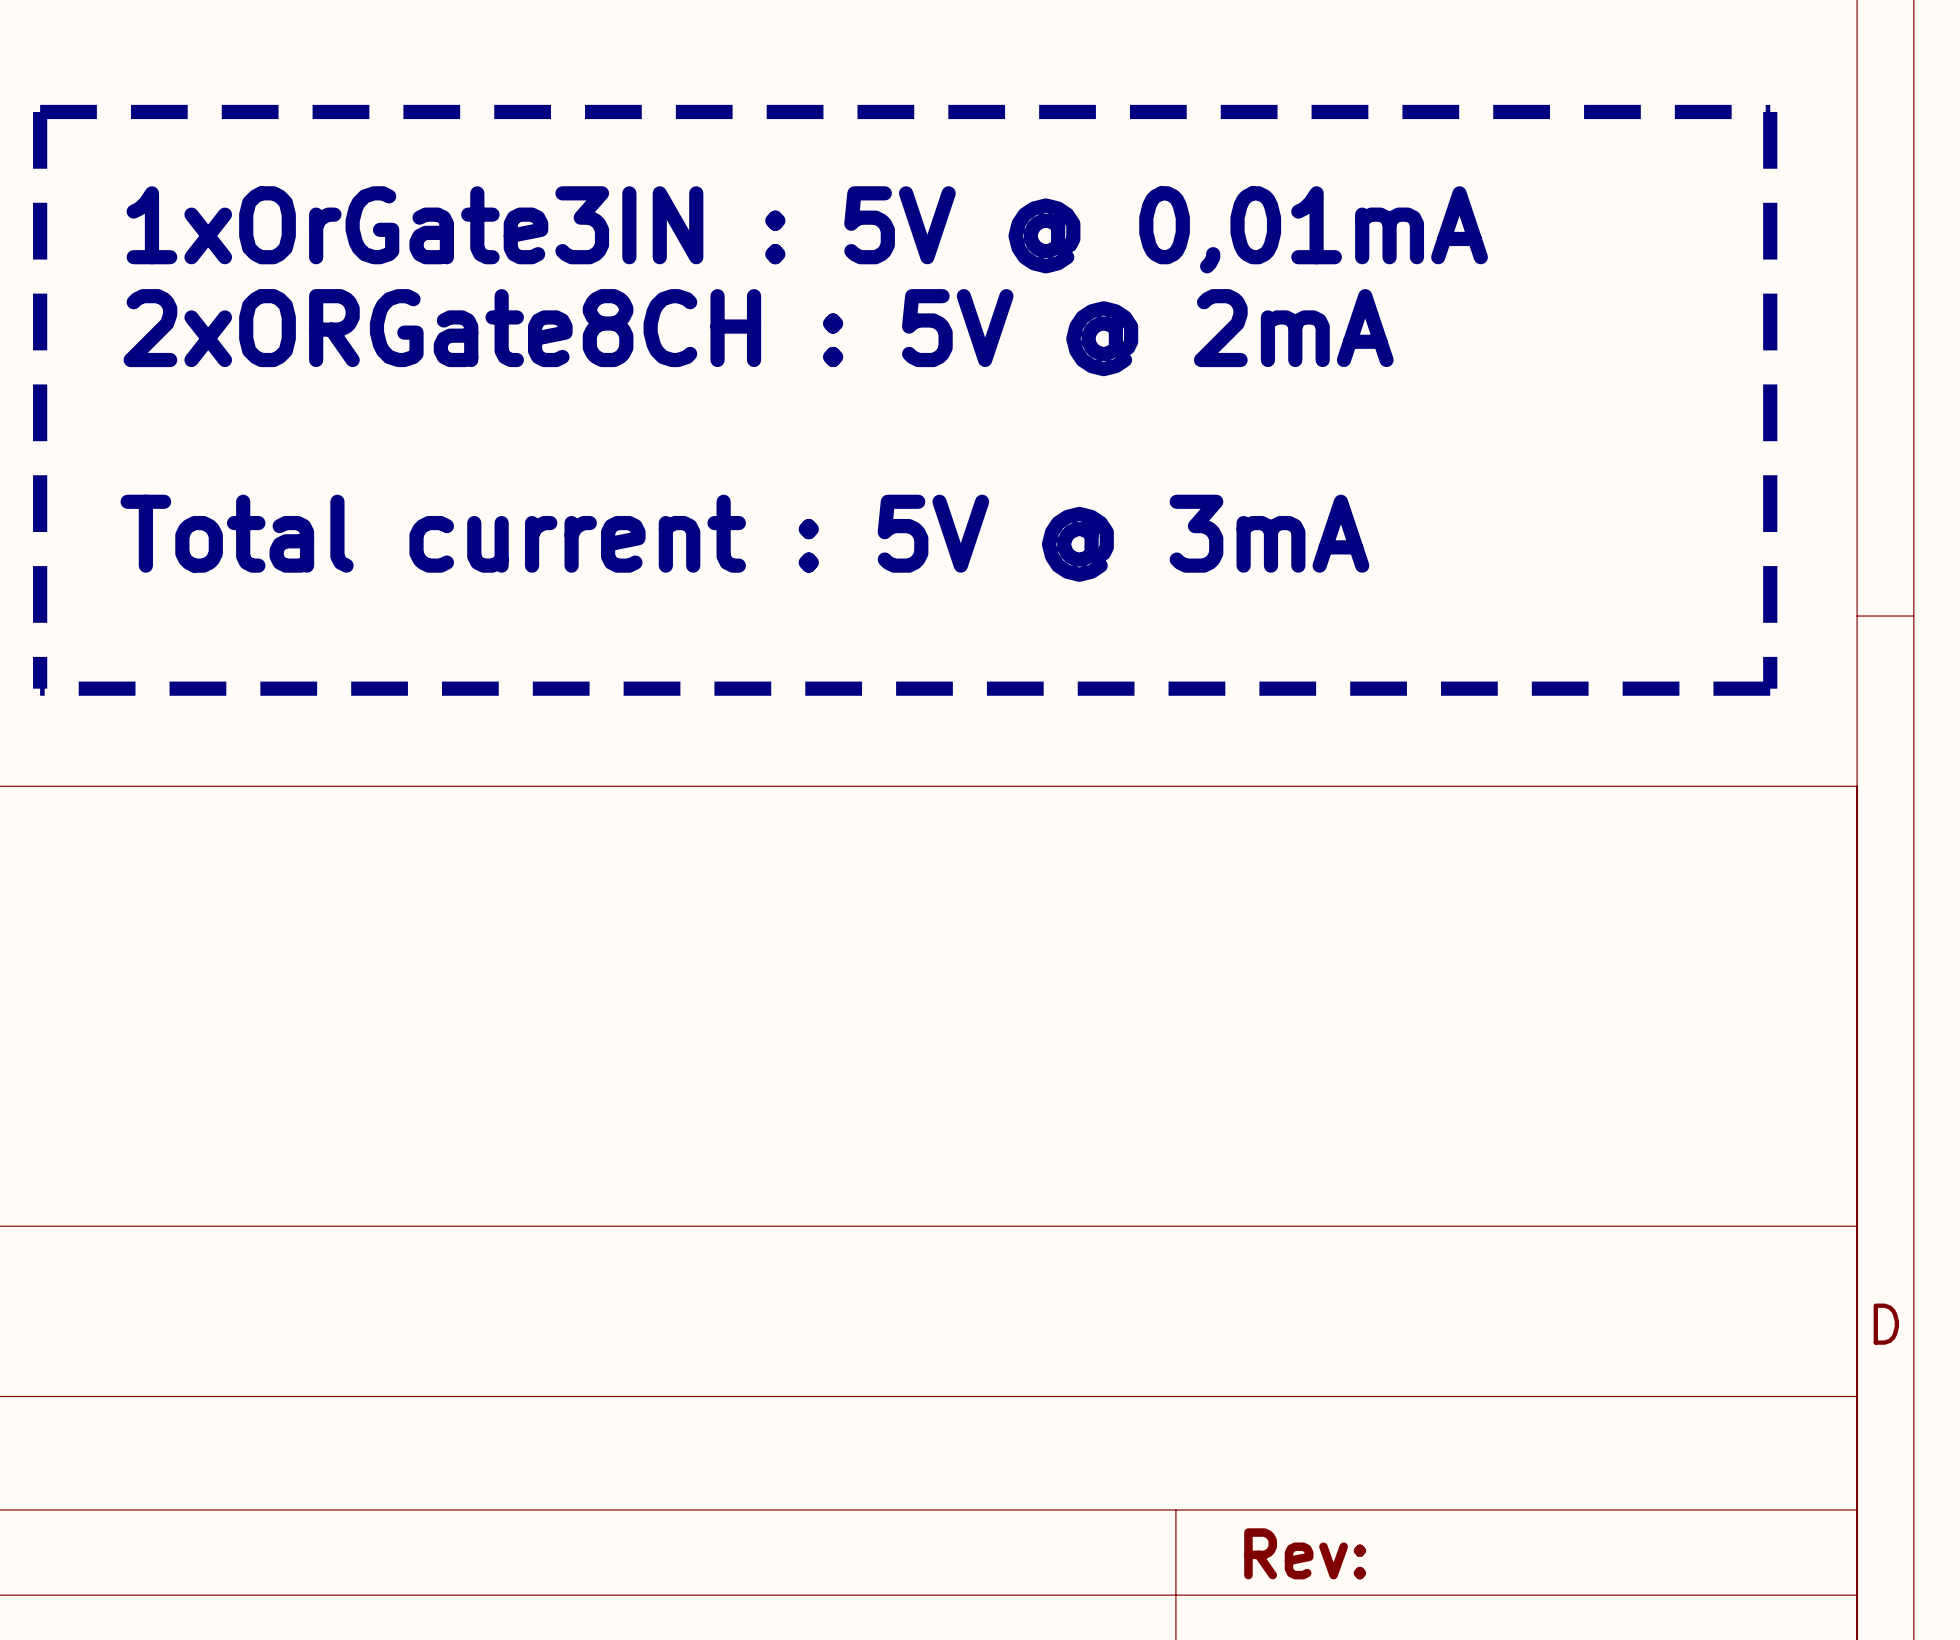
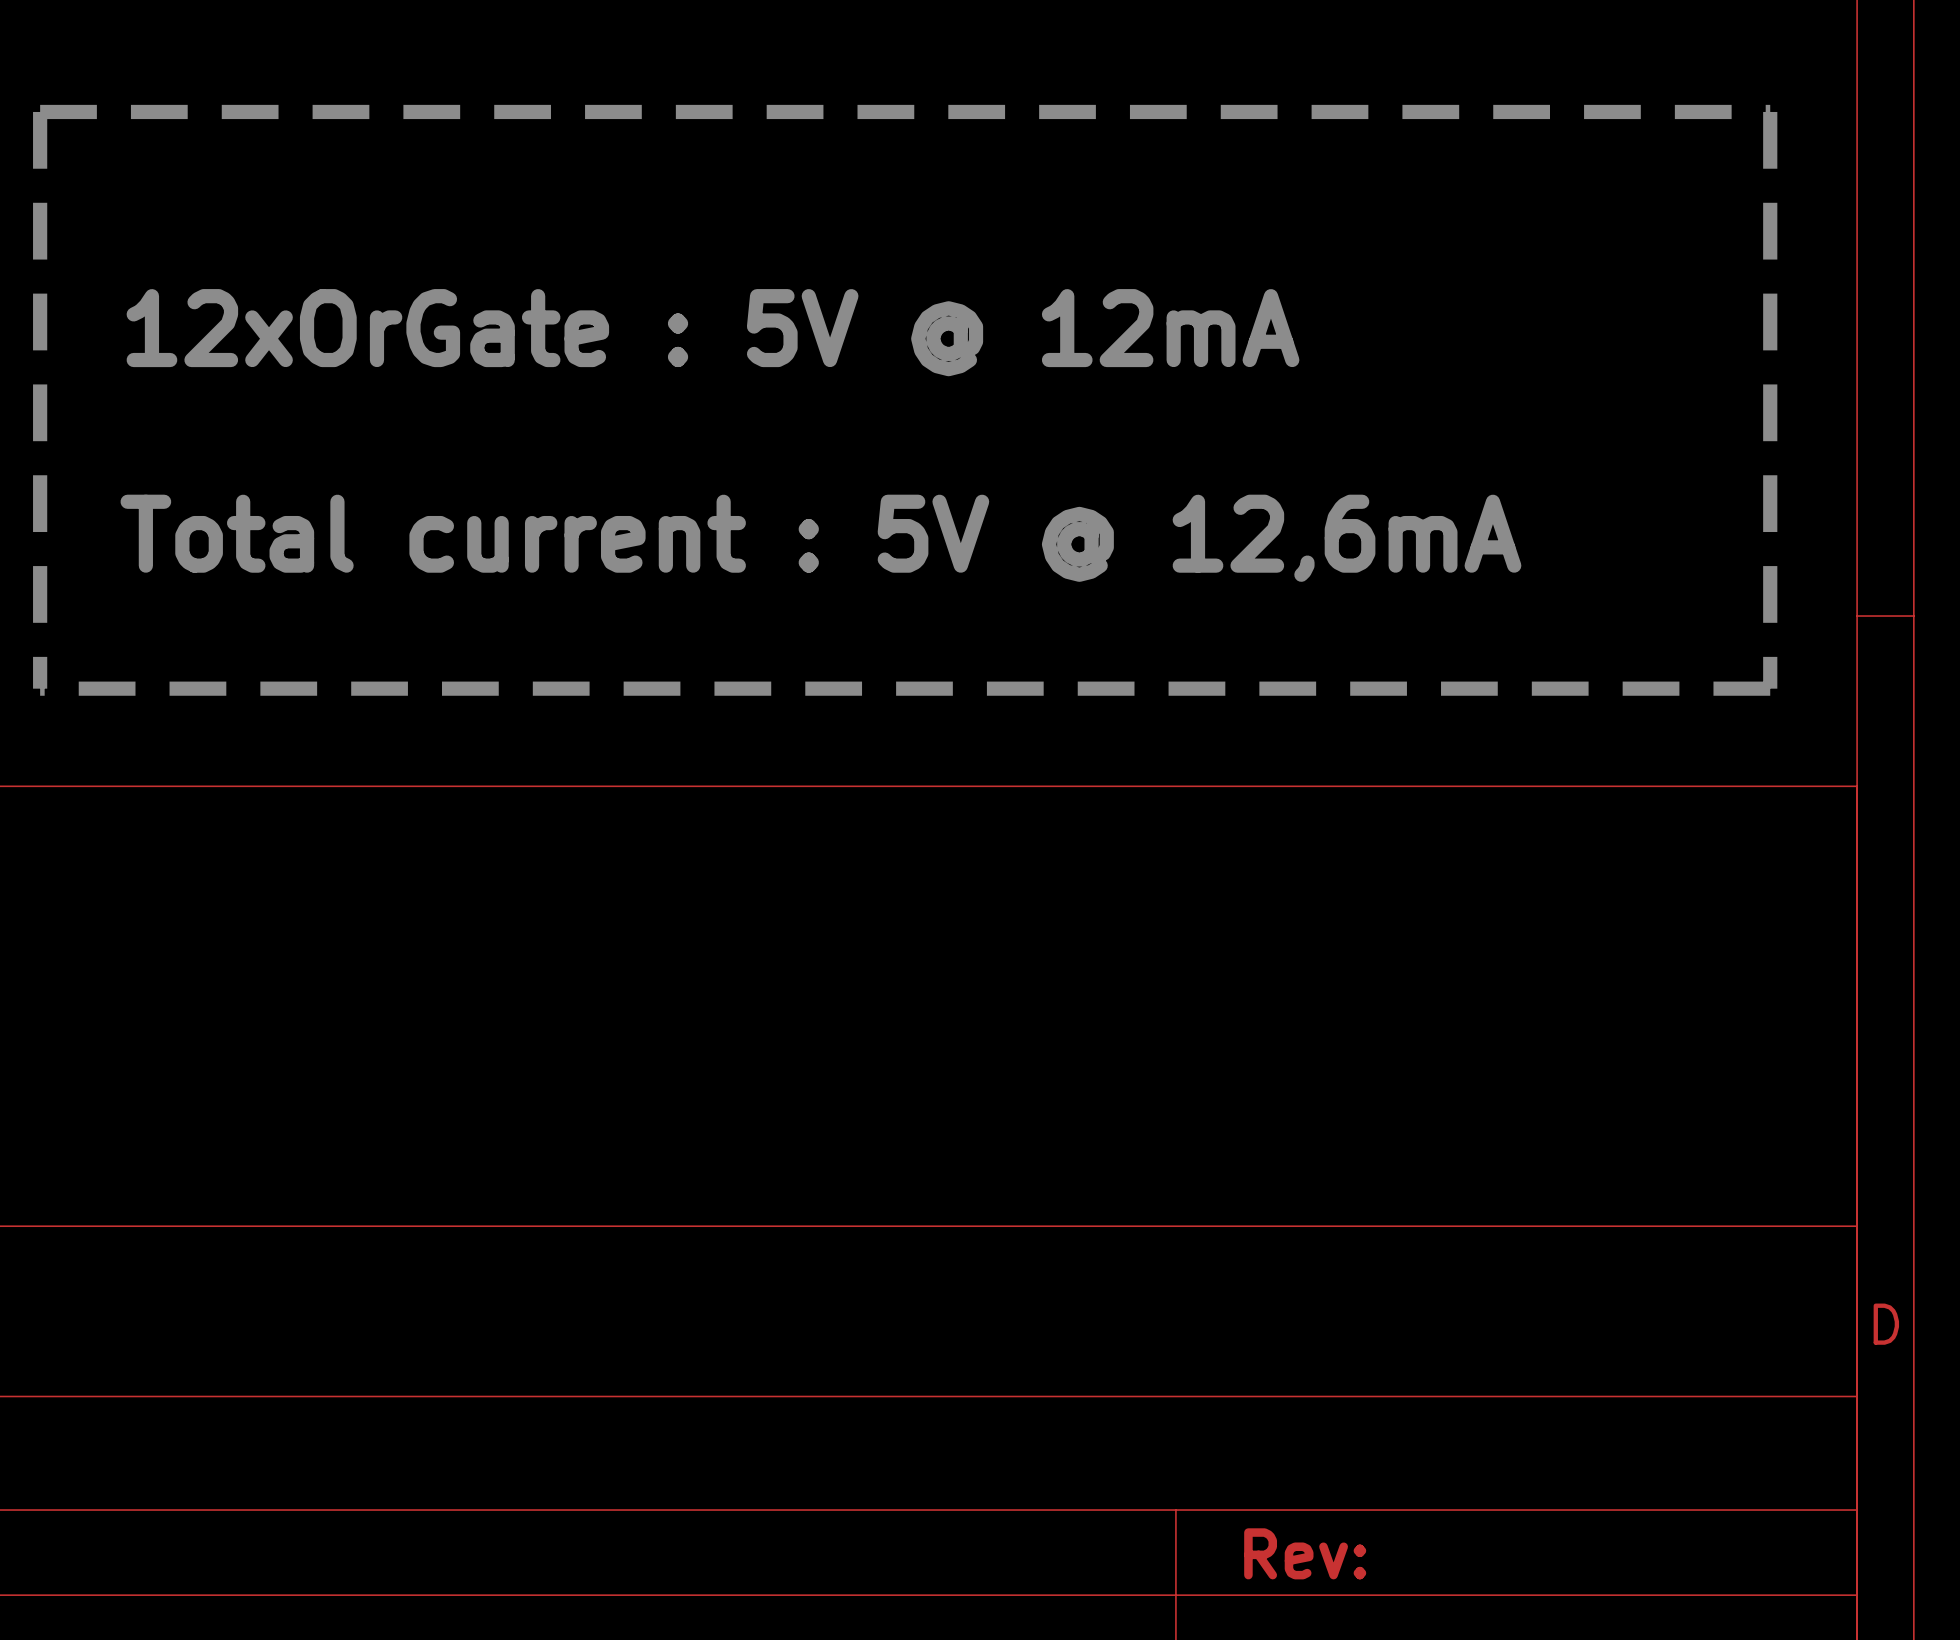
text: 1xOrGate3IN : 5V @ 0,01mA (807, 229) -> none
text: 2xORGate8CH : 5V @ 2mA (758, 332) -> 12xOrGate : 5V @ 12mA (712, 332)
text: Total current : 5V @ 3mA (744, 538) -> Total current : 5V @ 12,6mA (820, 538)

